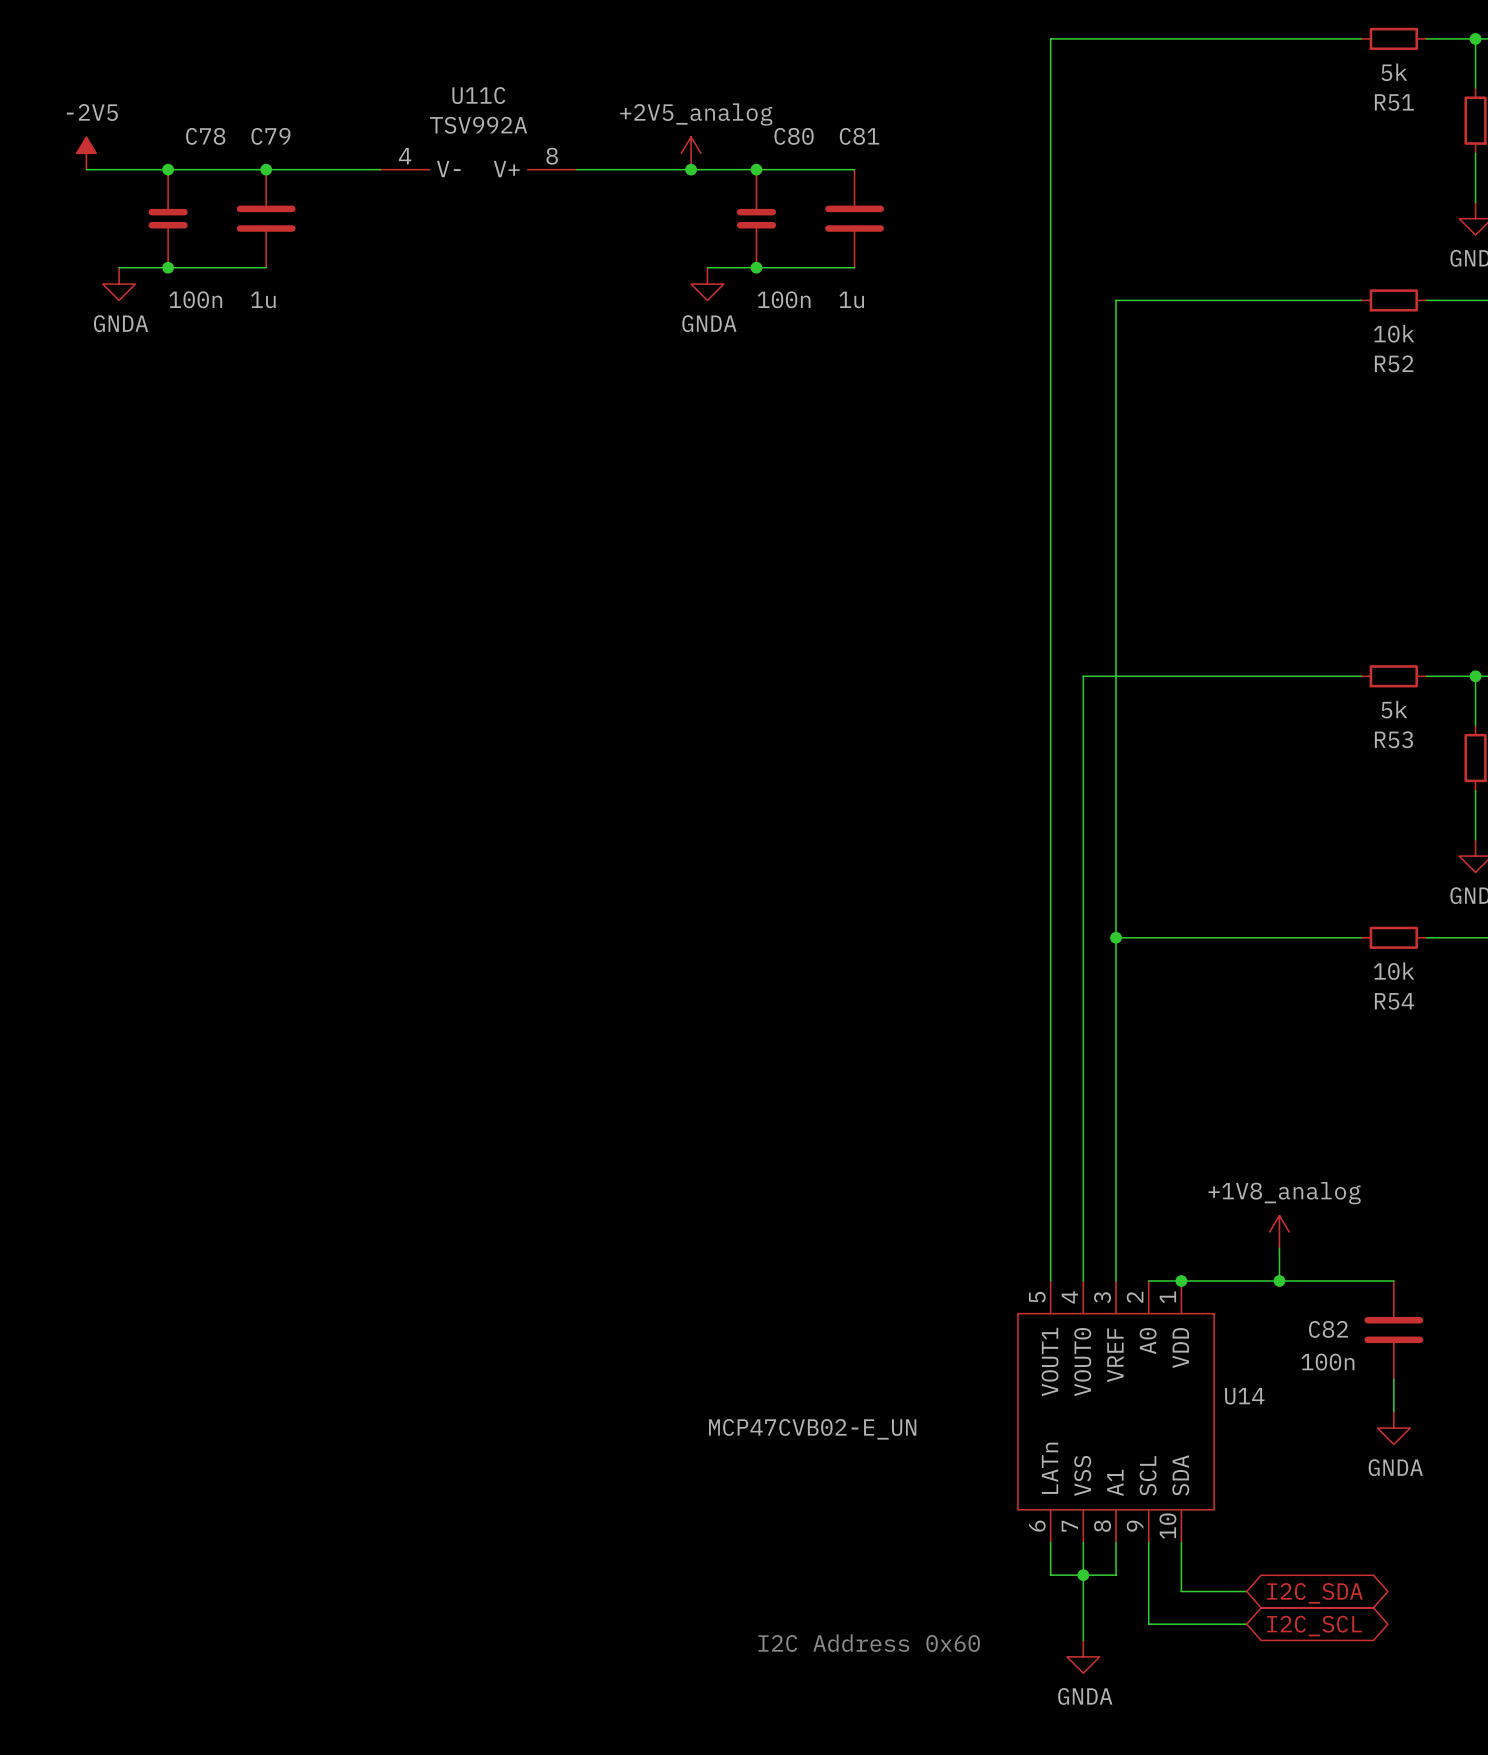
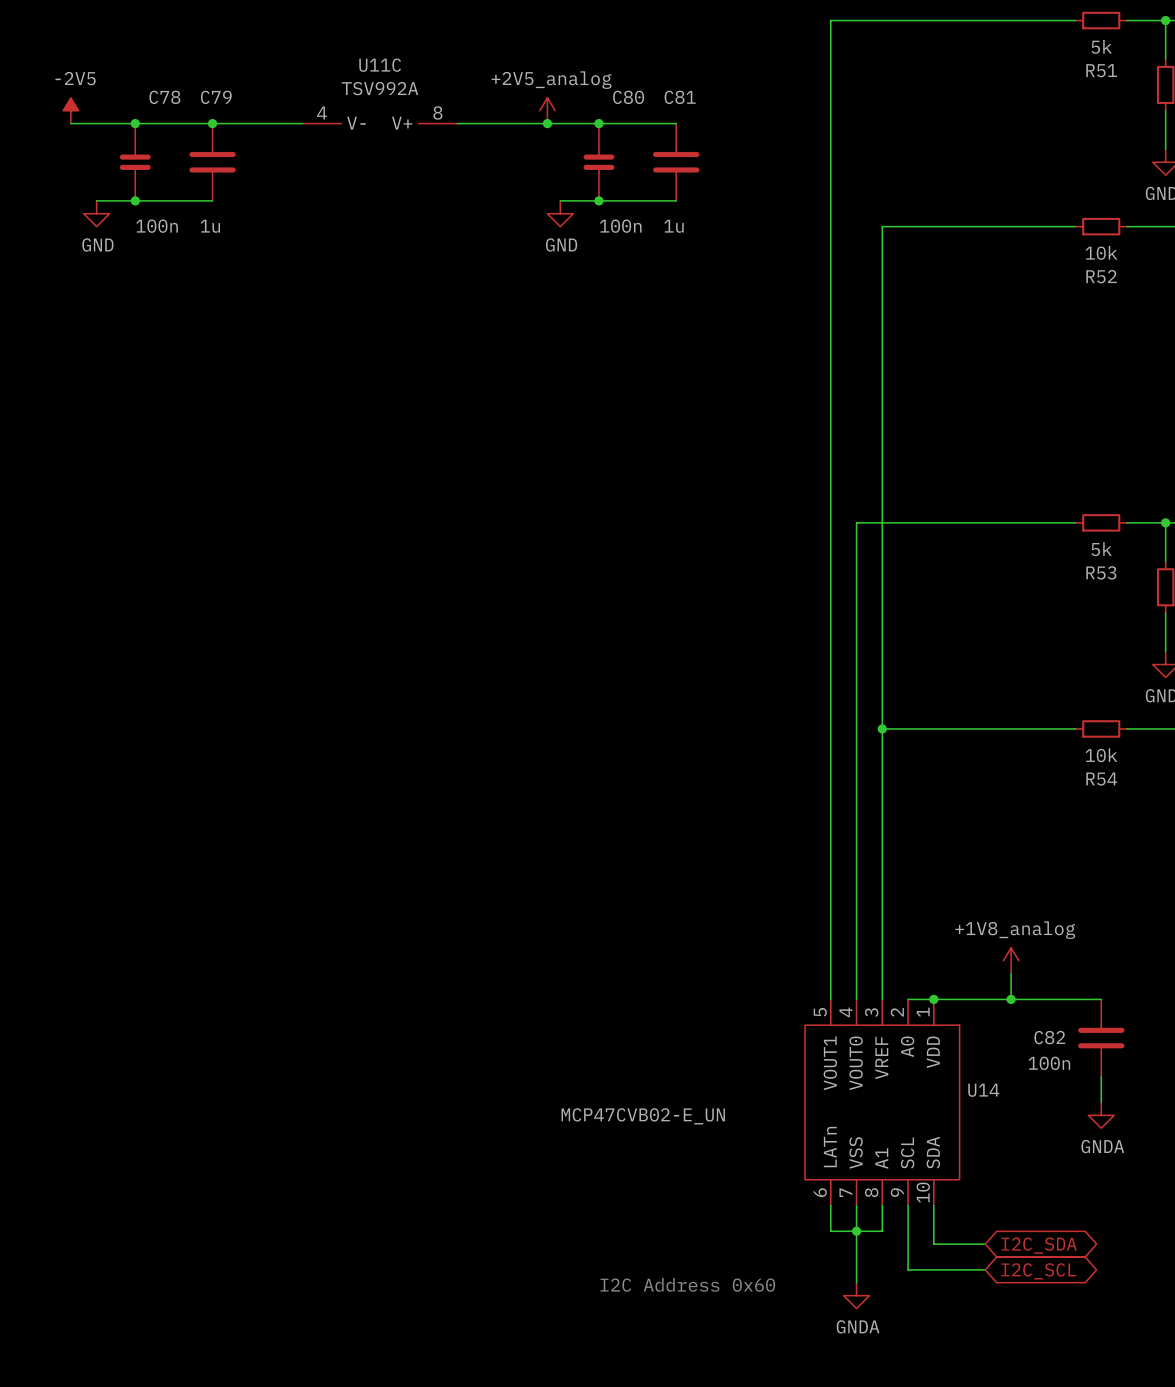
power symbol: GNDA (119, 284) -> GND (96, 213)
power symbol: GNDA (707, 284) -> GND (560, 213)

